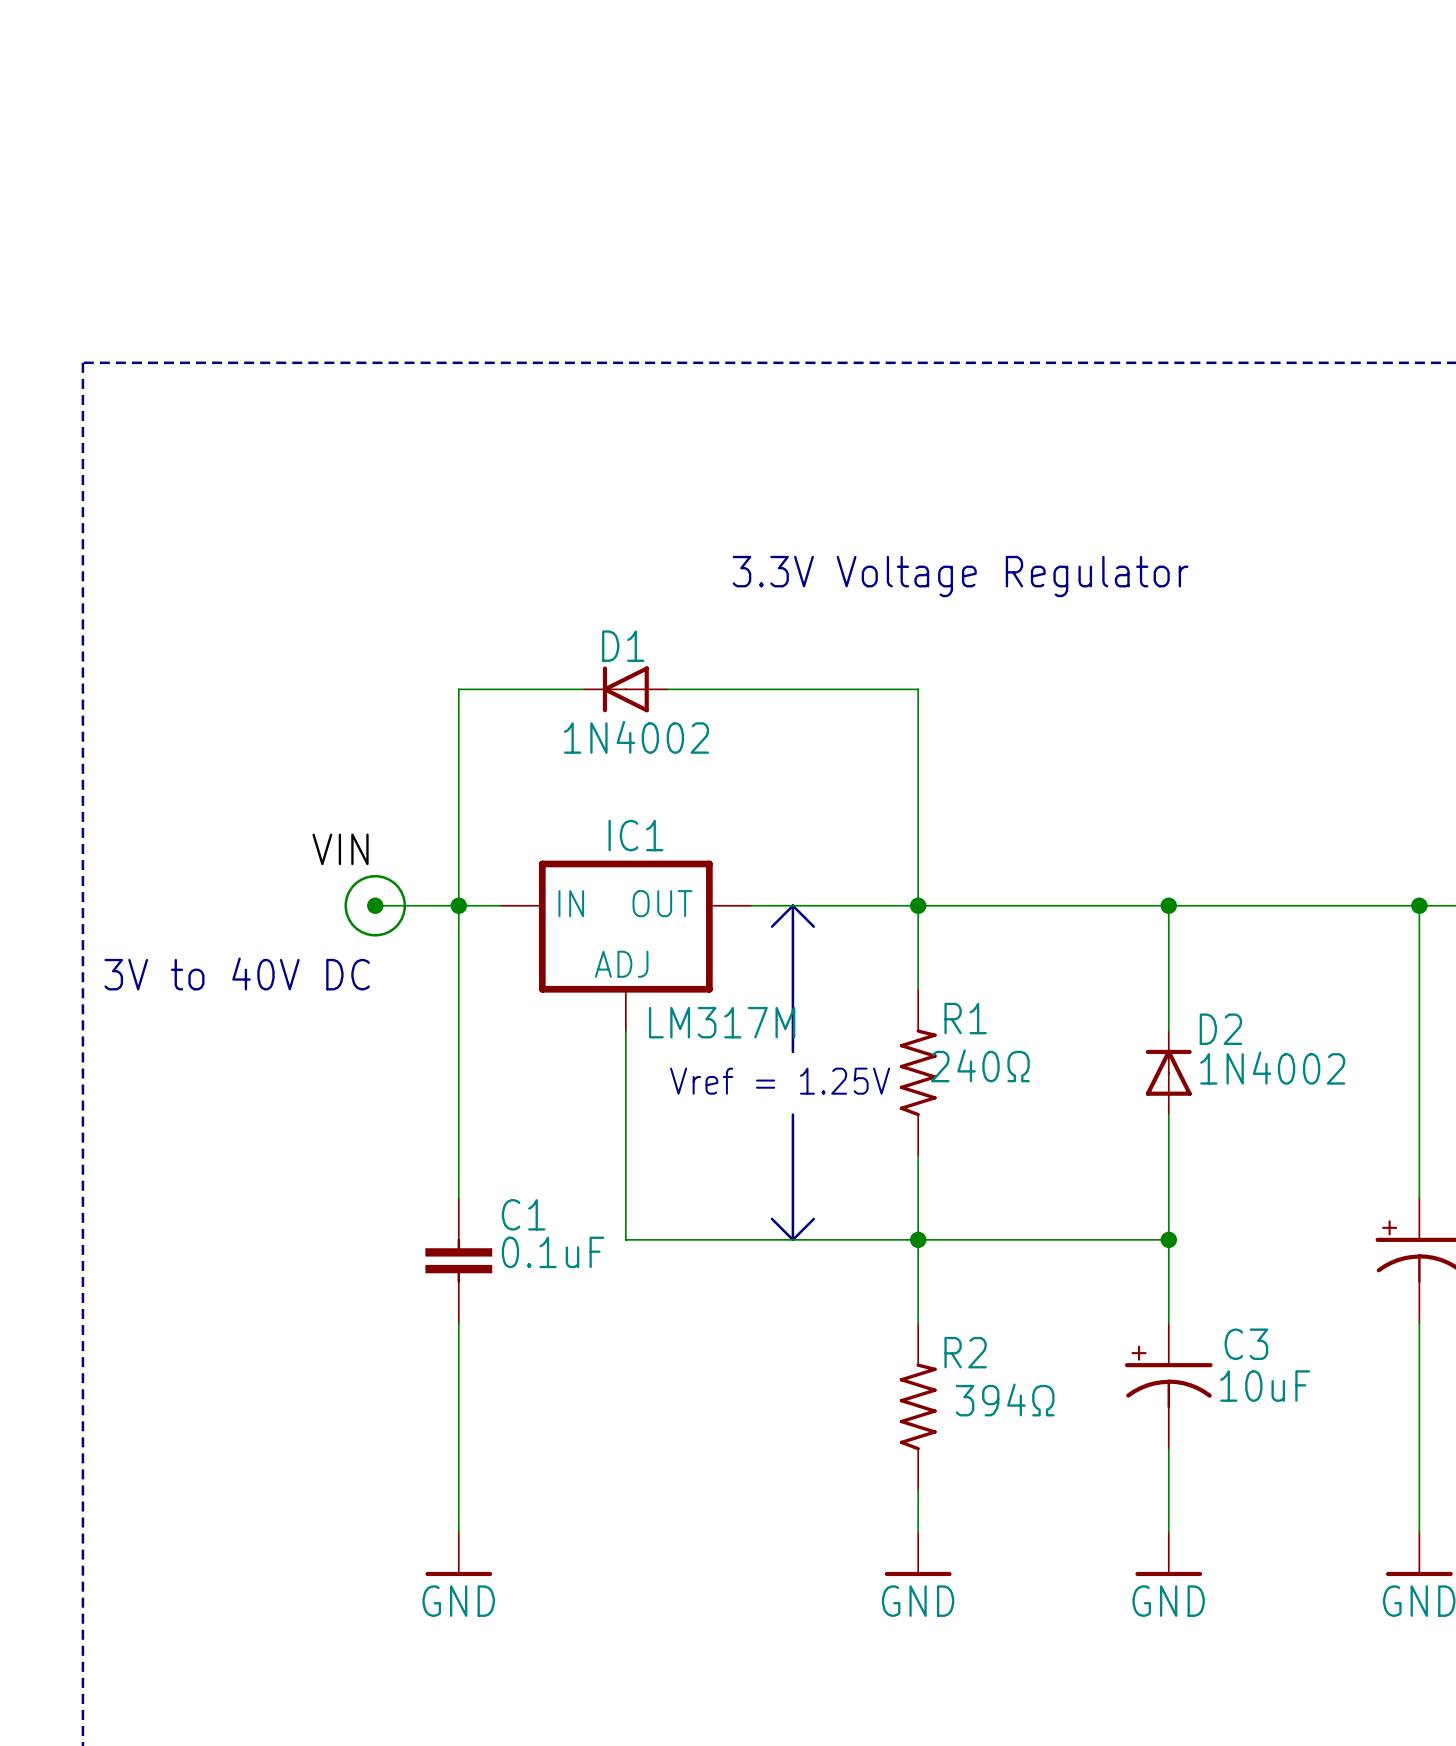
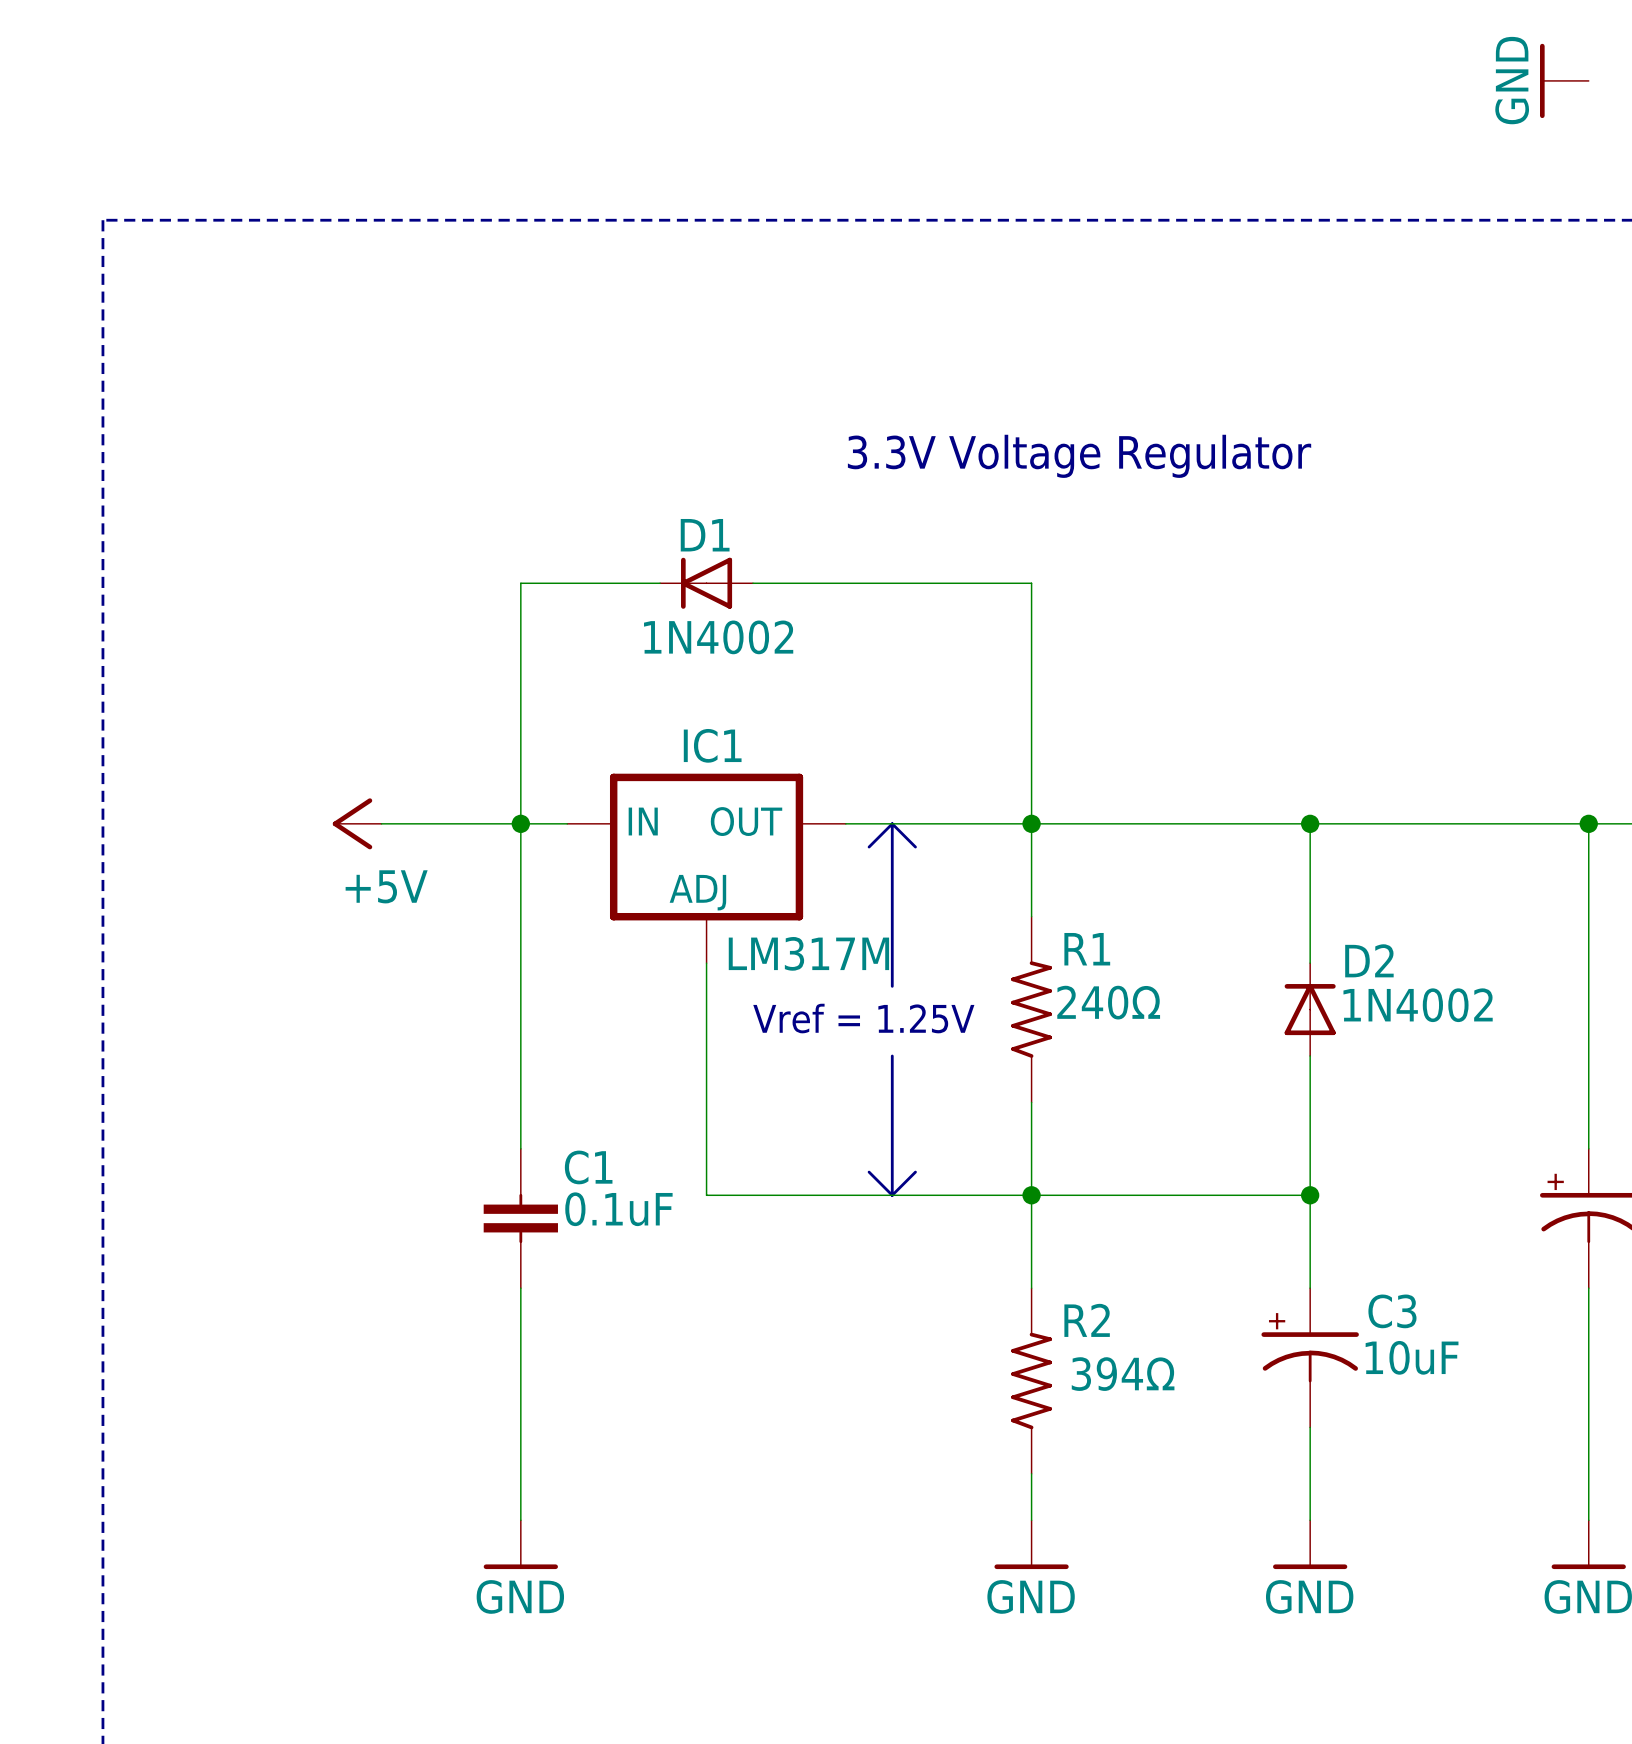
power symbol: none -> GND (1564, 80)
label: VIN (340, 849) -> none
drawing: [344, 874, 407, 937] -> none
power symbol: none -> +5V (357, 823)
wire: none -> (381, 823) (427, 823)
junction: (375, 905) -> none
text: 3V to 40V DC (237, 973) -> none

